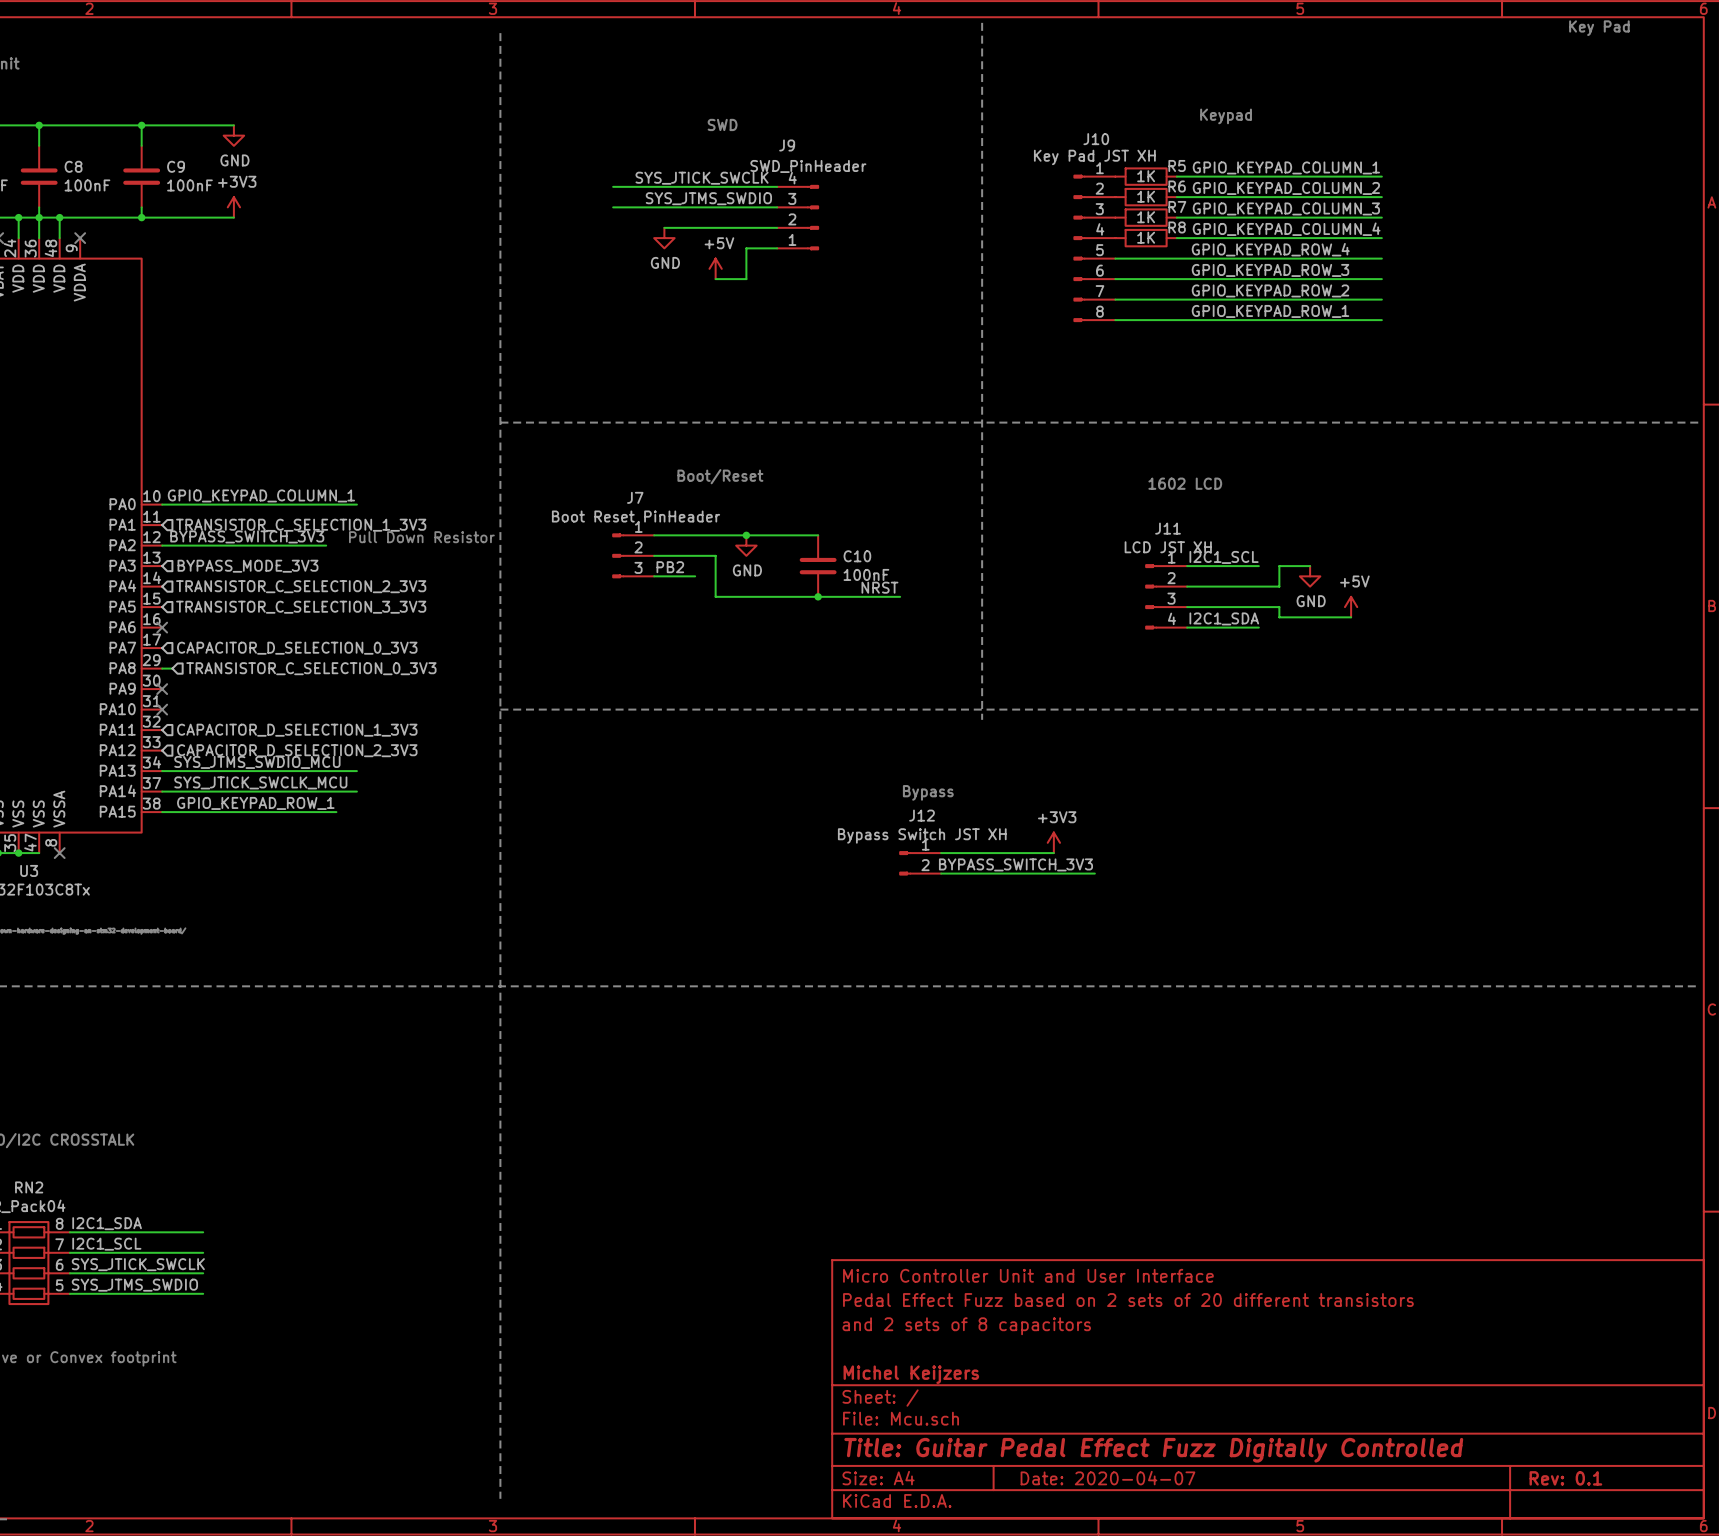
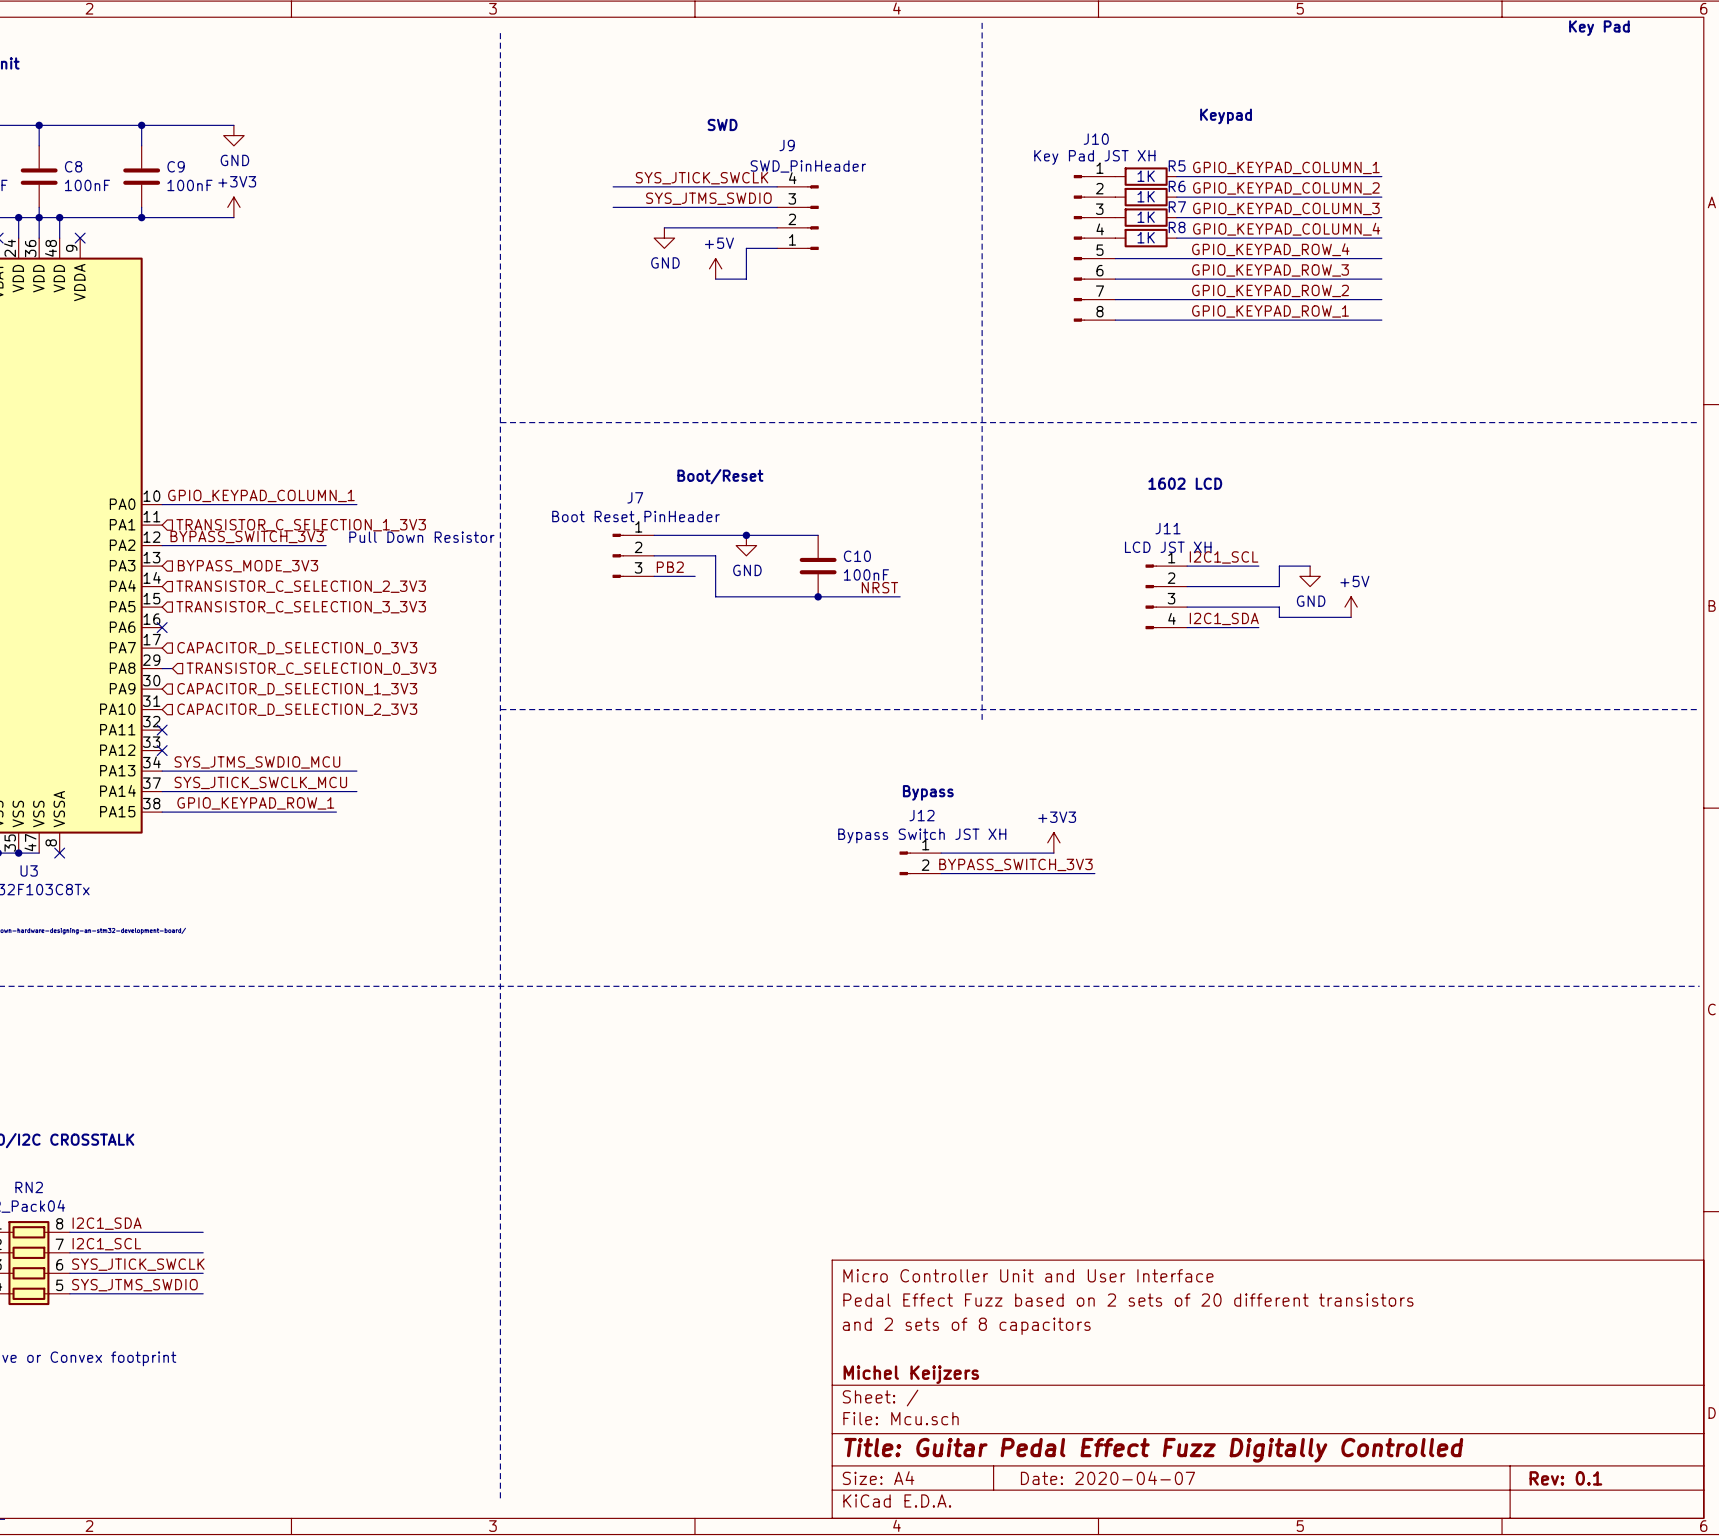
no-connect mark: (162, 689) -> none
no-connect mark: (162, 709) -> none
no-connect mark: none -> (162, 730)
hierarchical label position: CAPACITOR_D_SELECTION_1_3V3 (297, 730) -> CAPACITOR_D_SELECTION_1_3V3 (297, 689)
no-connect mark: none -> (162, 750)
hierarchical label position: CAPACITOR_D_SELECTION_2_3V3 (297, 750) -> CAPACITOR_D_SELECTION_2_3V3 (297, 709)

